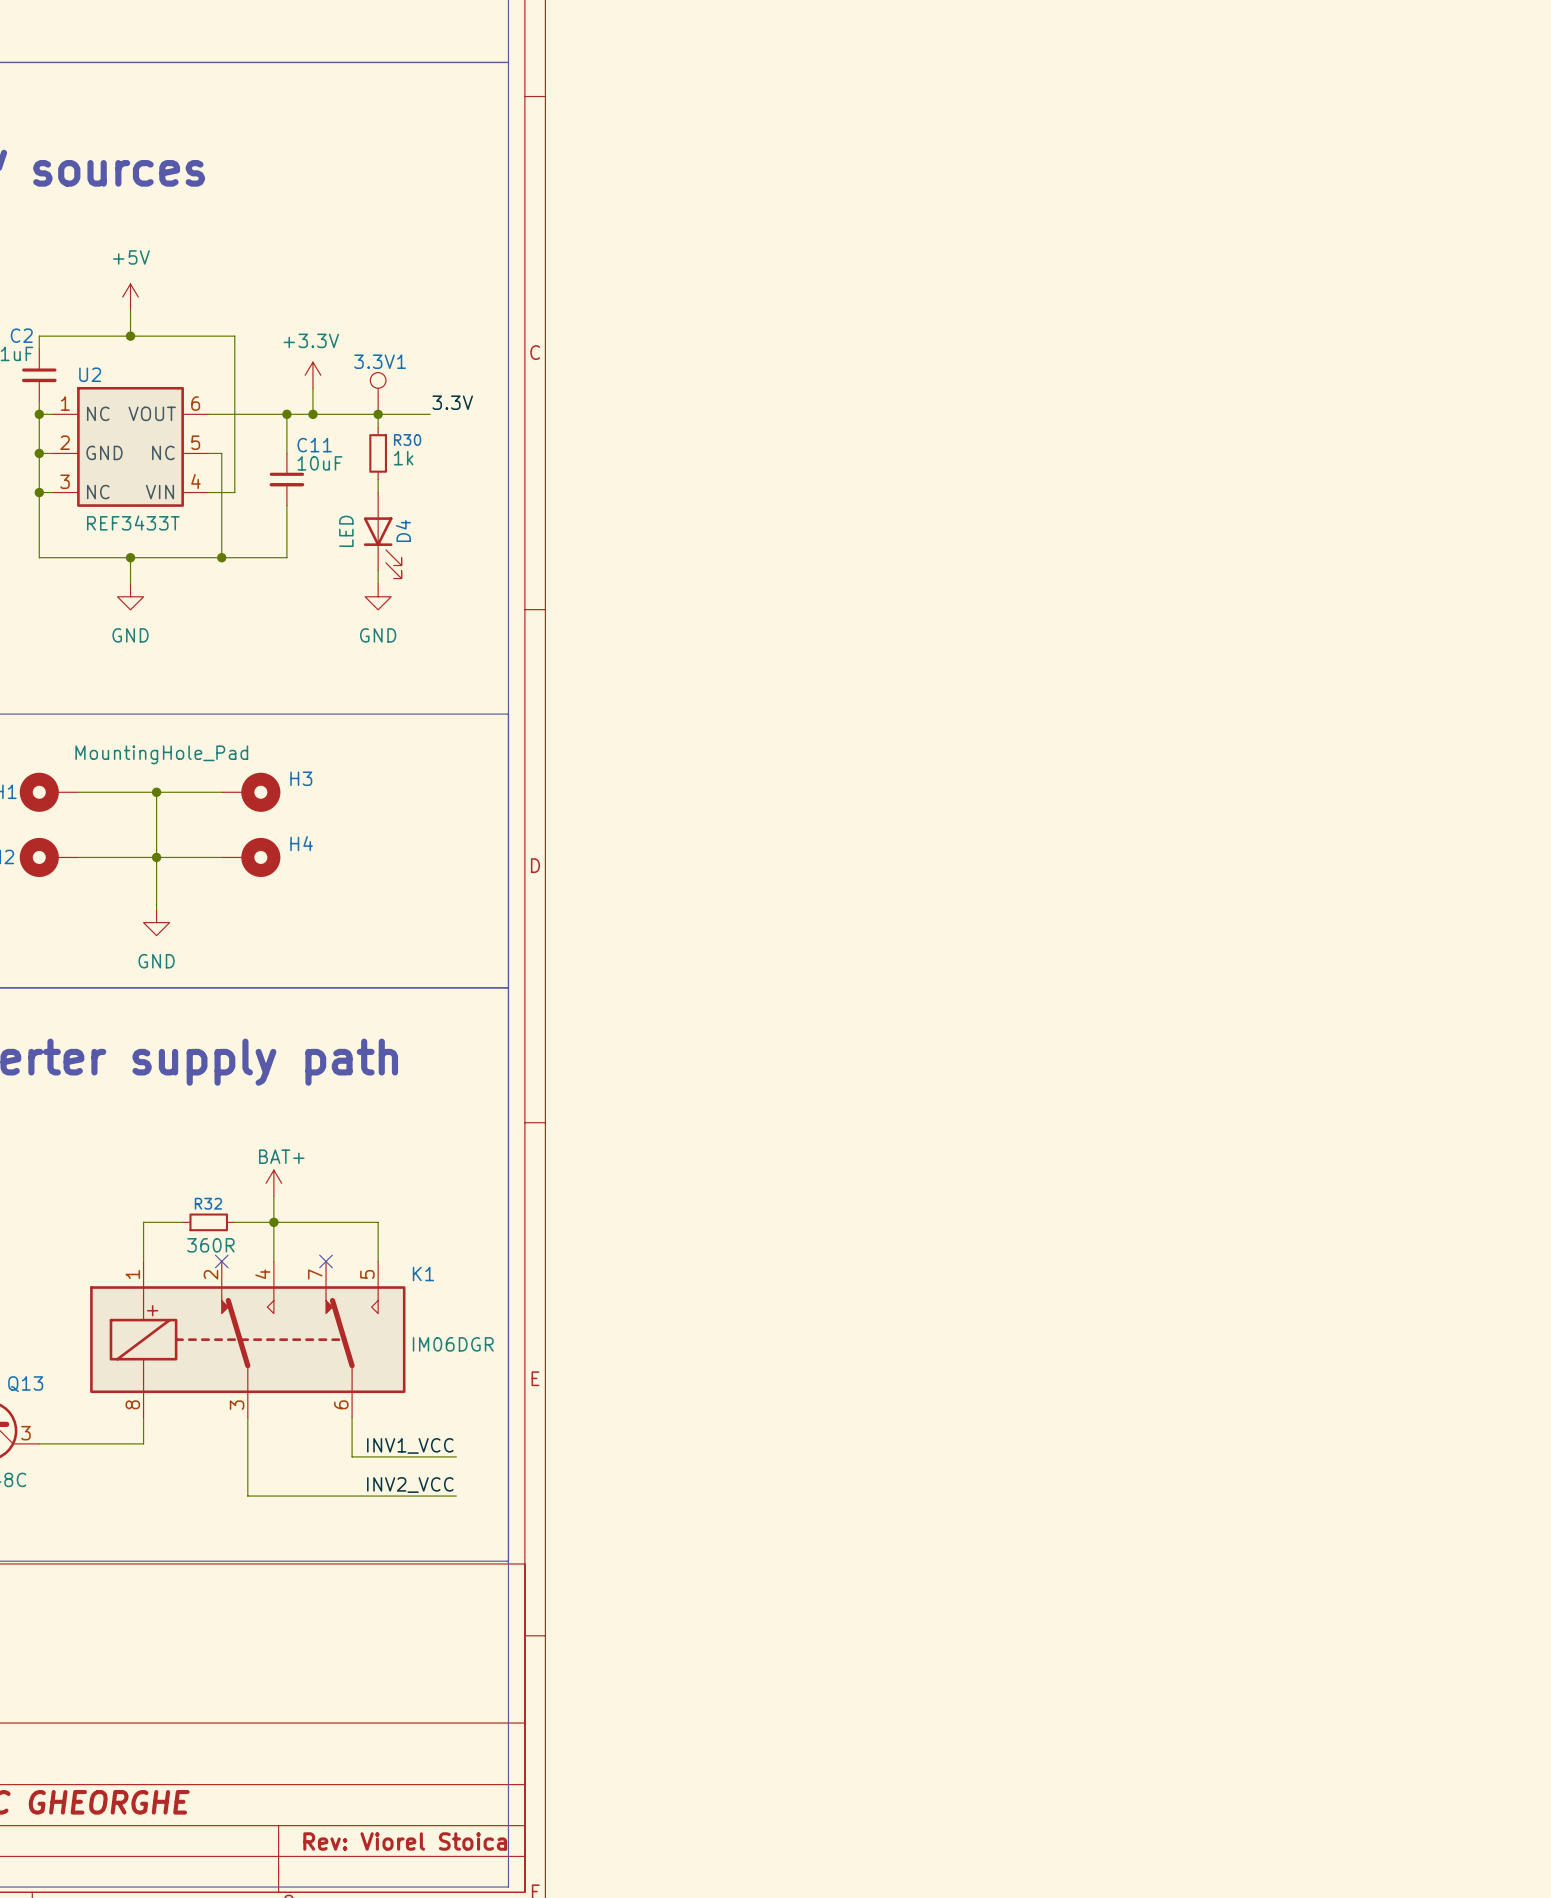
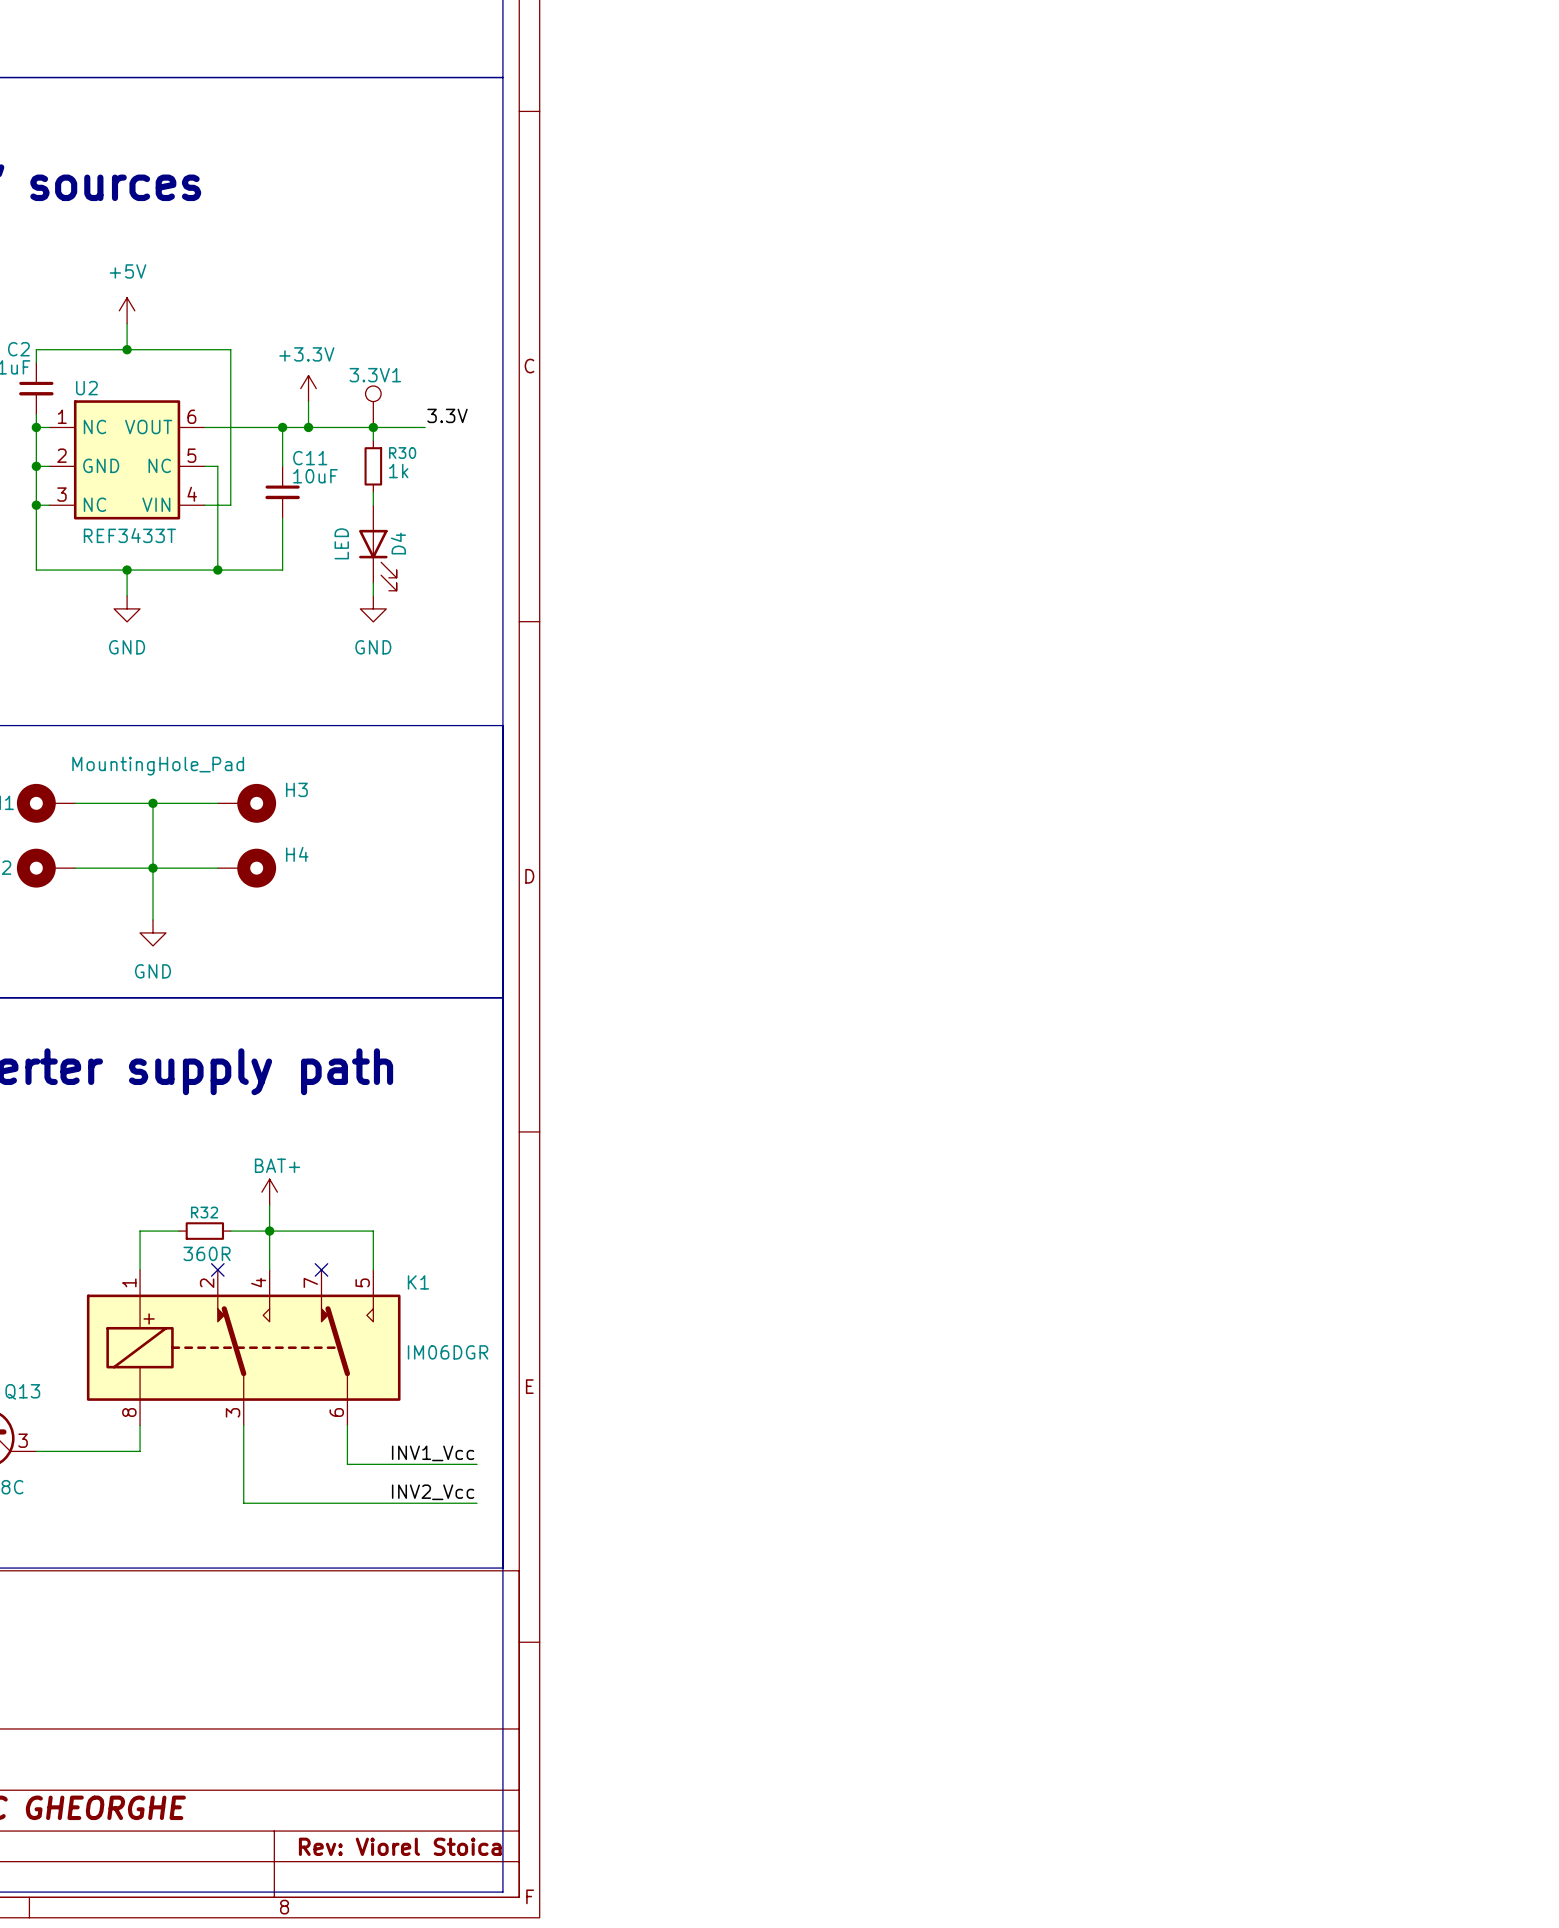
label: INV1_VCC (410, 1445) -> INV1_Vcc (433, 1453)
wire: none -> (451, 1464) (477, 1464)
label: INV2_VCC (410, 1485) -> INV2_Vcc (433, 1492)
wire: none -> (451, 1503) (477, 1503)

